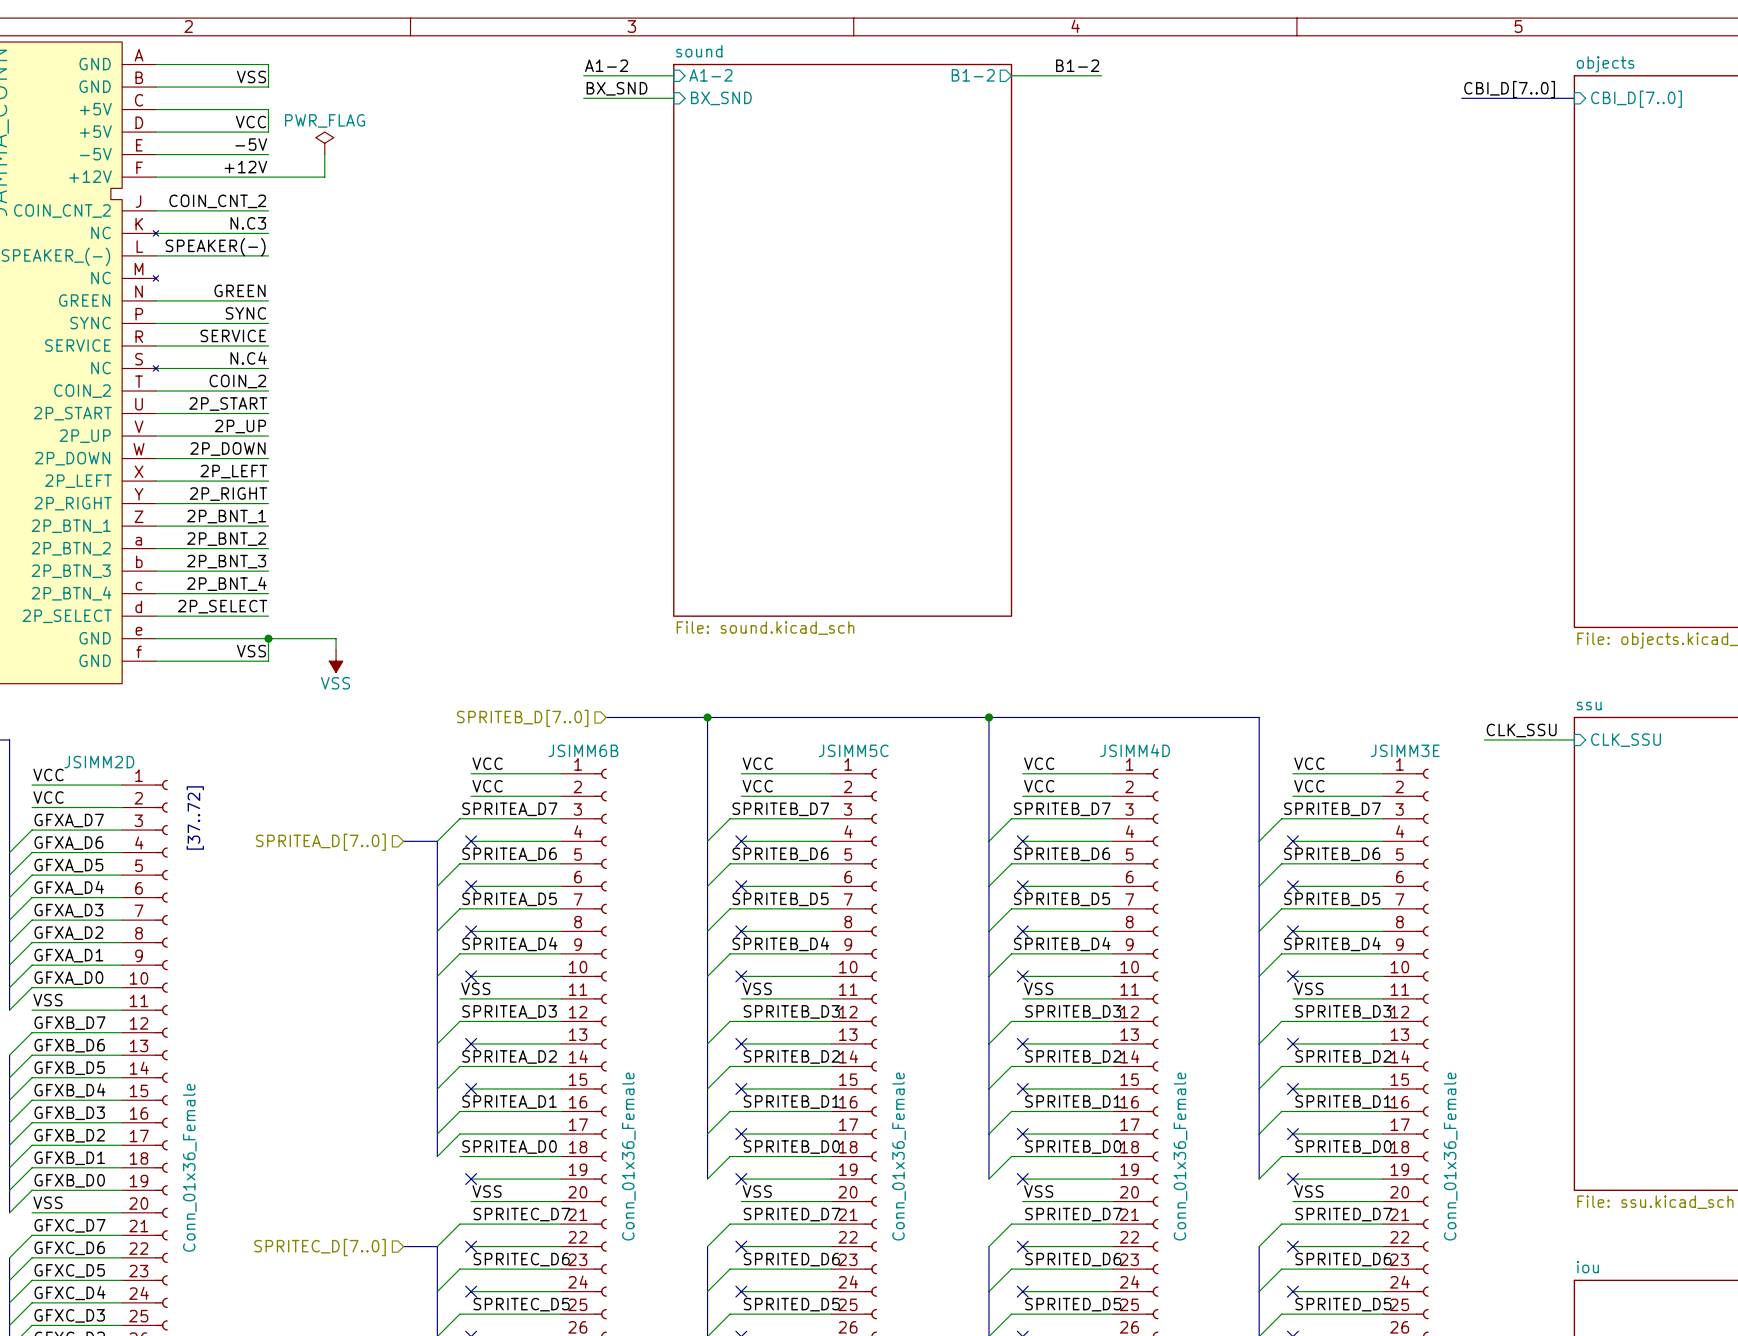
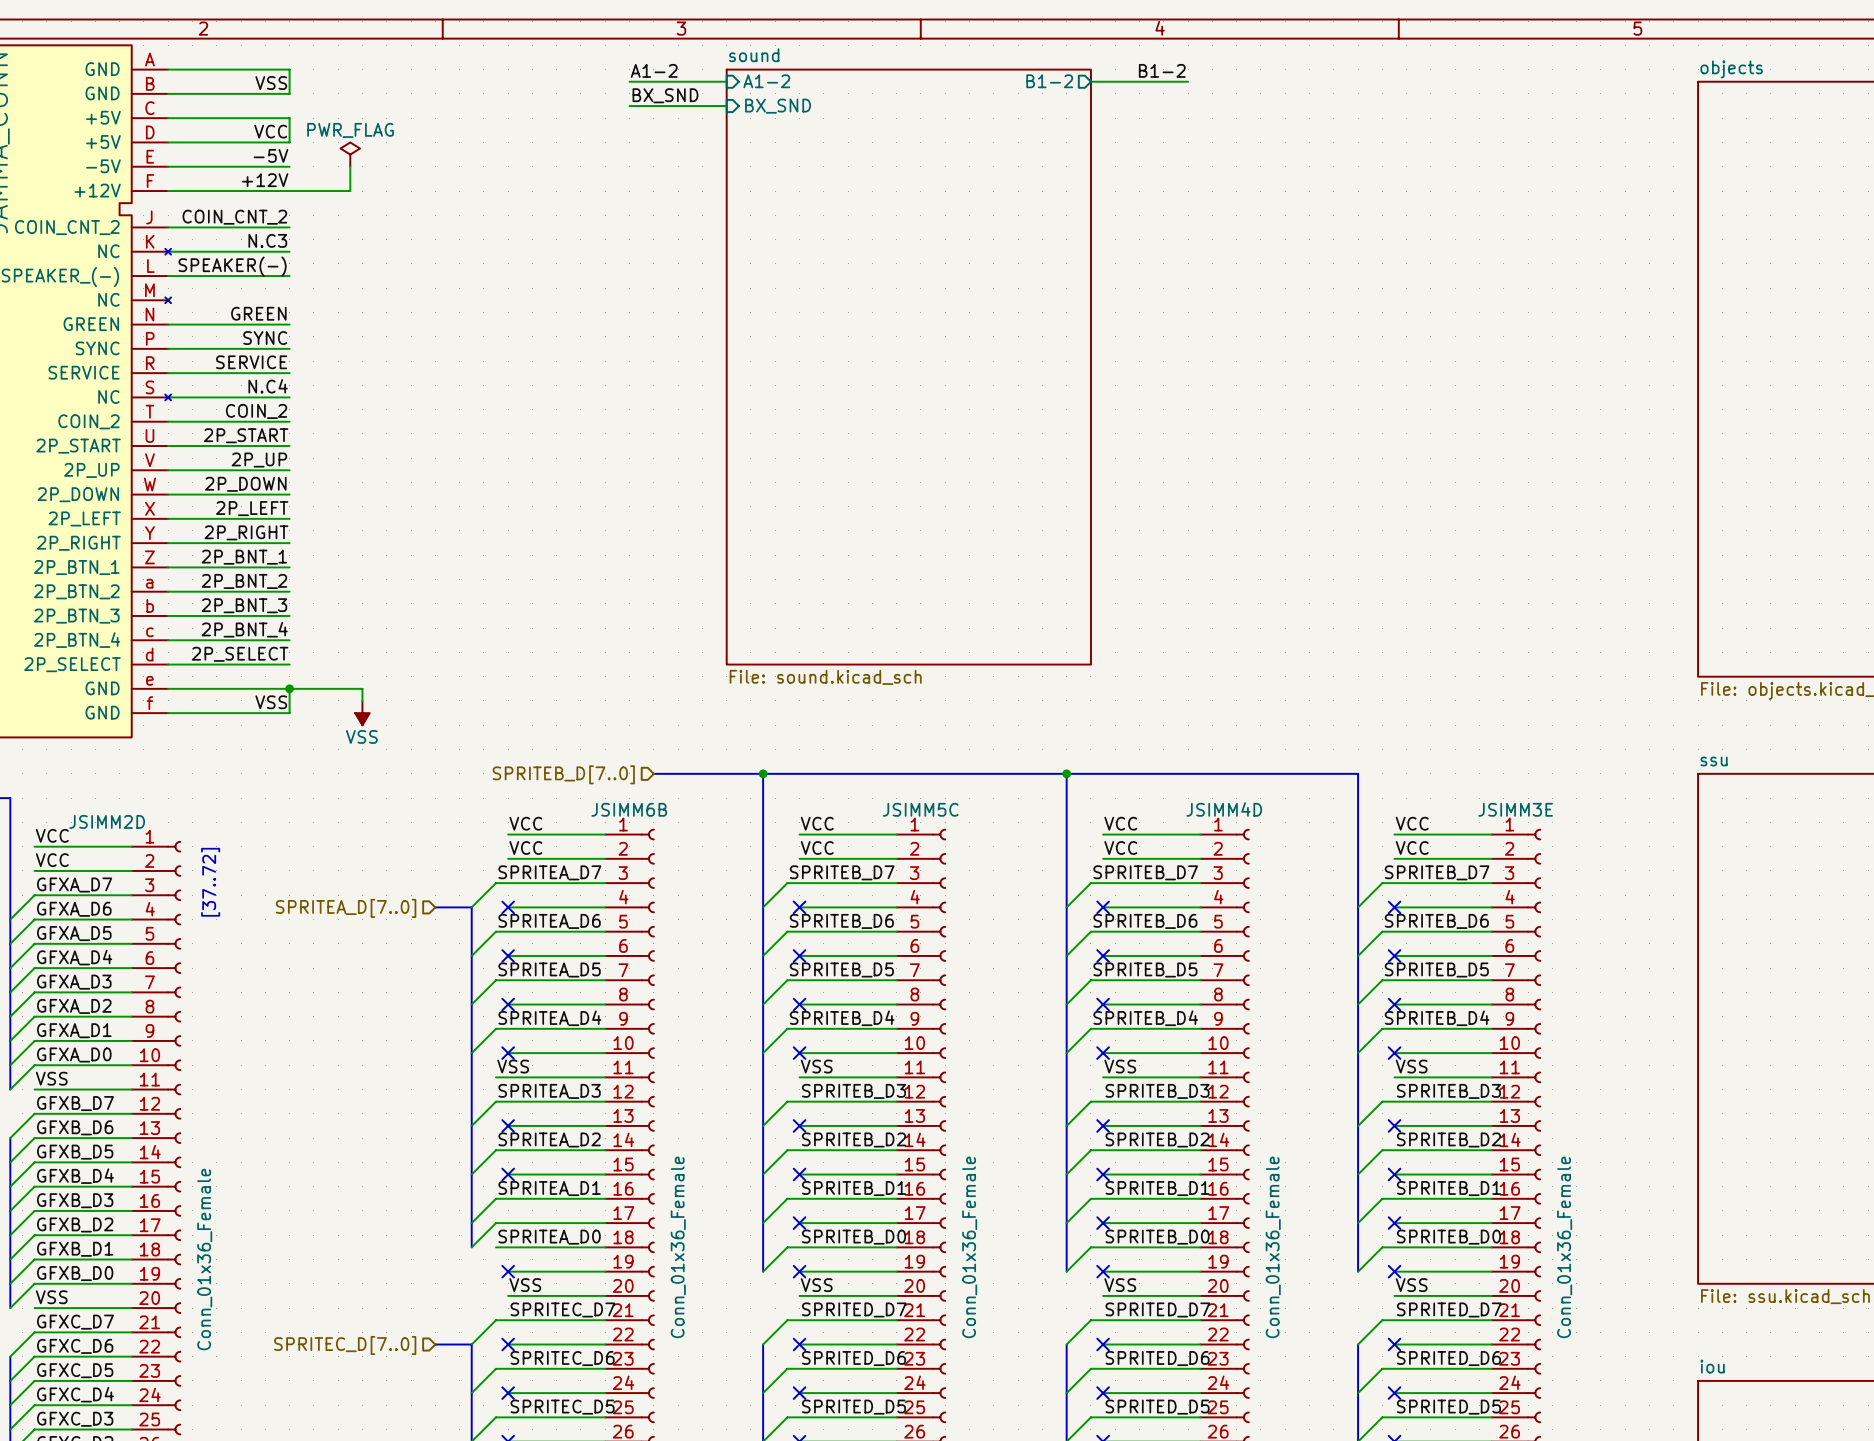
label: CBI_D[7..0] (1509, 89) -> none
bus: (1461, 98) (1574, 98) -> none
sheet pin: CBI_D[7..0] (1636, 99) -> none
label: CLK_SSU (1521, 730) -> none
wire: (1484, 739) (1574, 739) -> none
sheet pin: CLK_SSU (1626, 740) -> none

